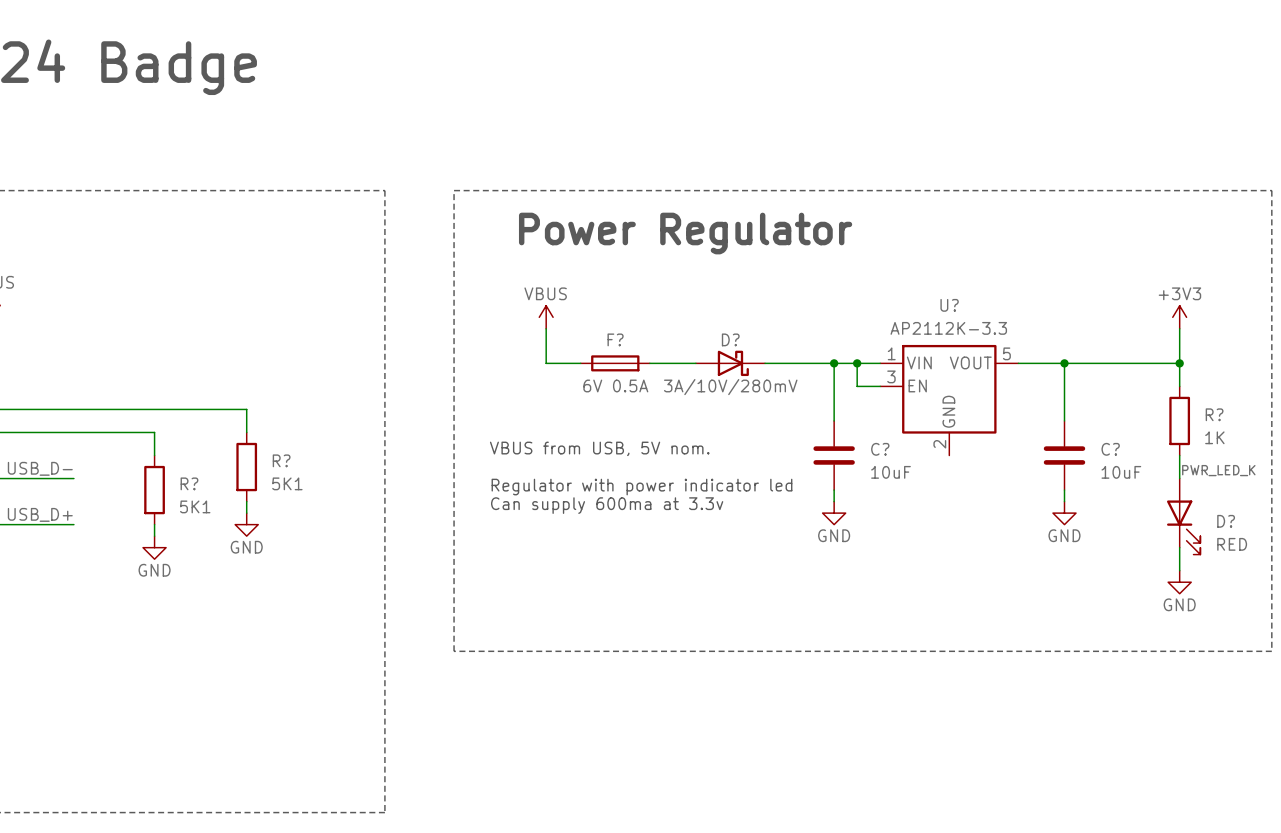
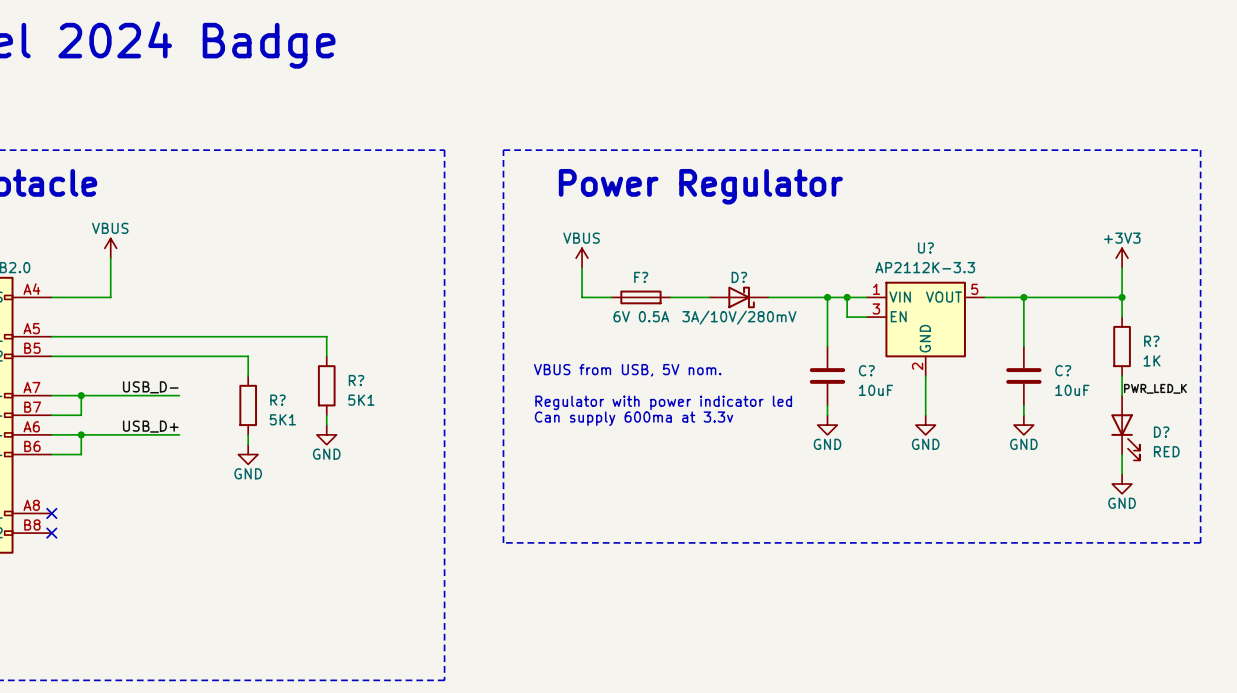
wire: none -> (925, 375) (925, 415)
power symbol: none -> GND (925, 425)

